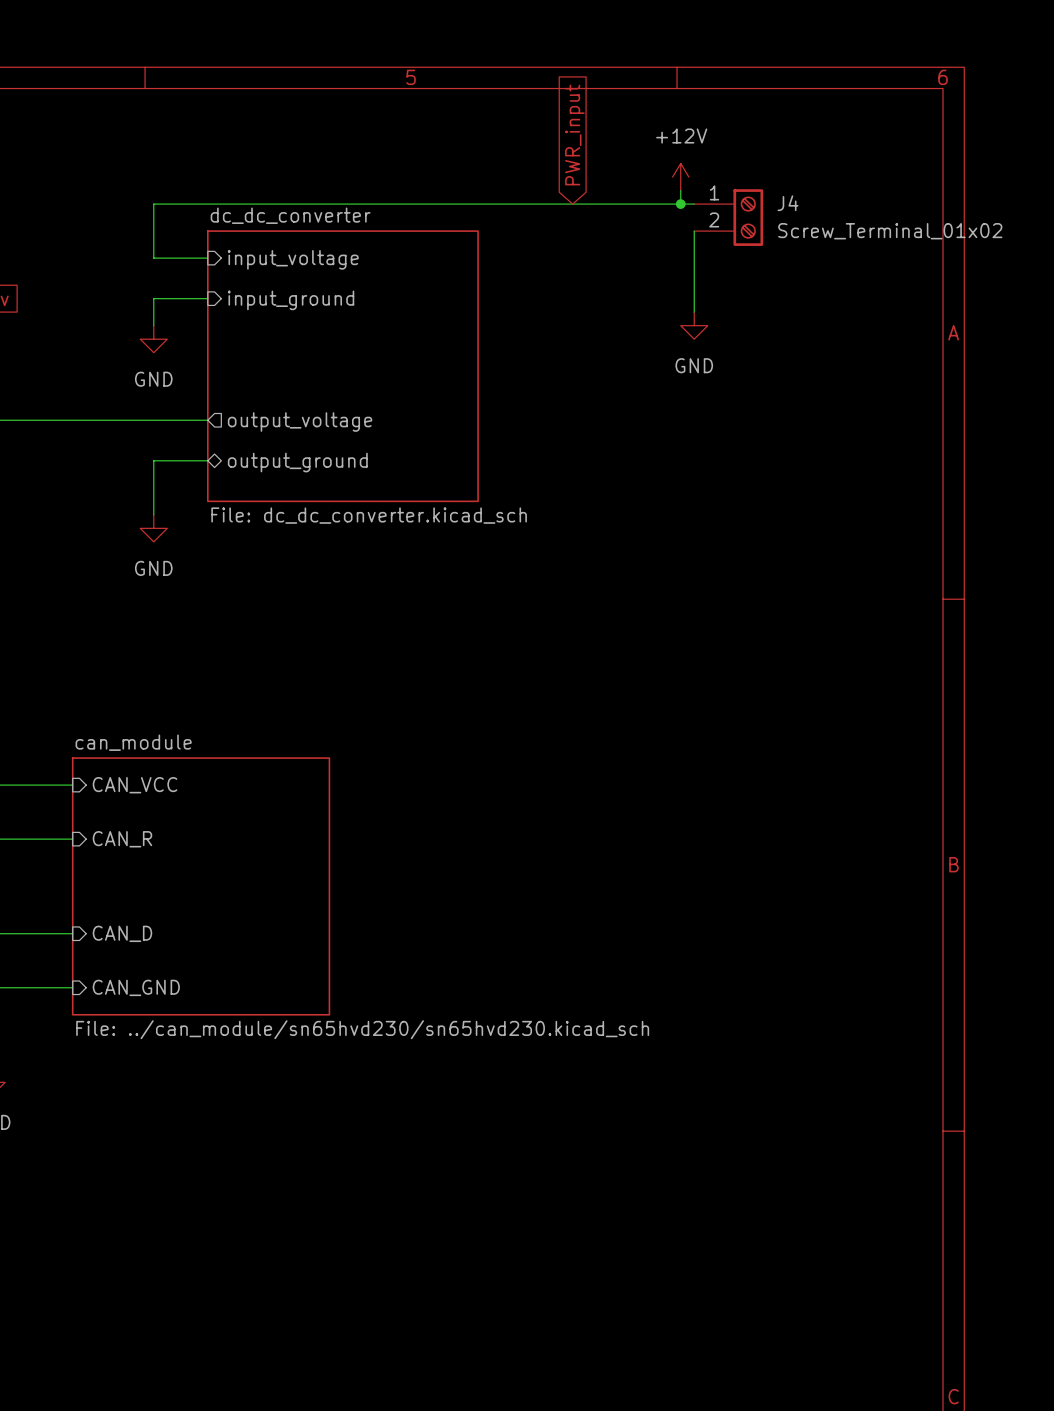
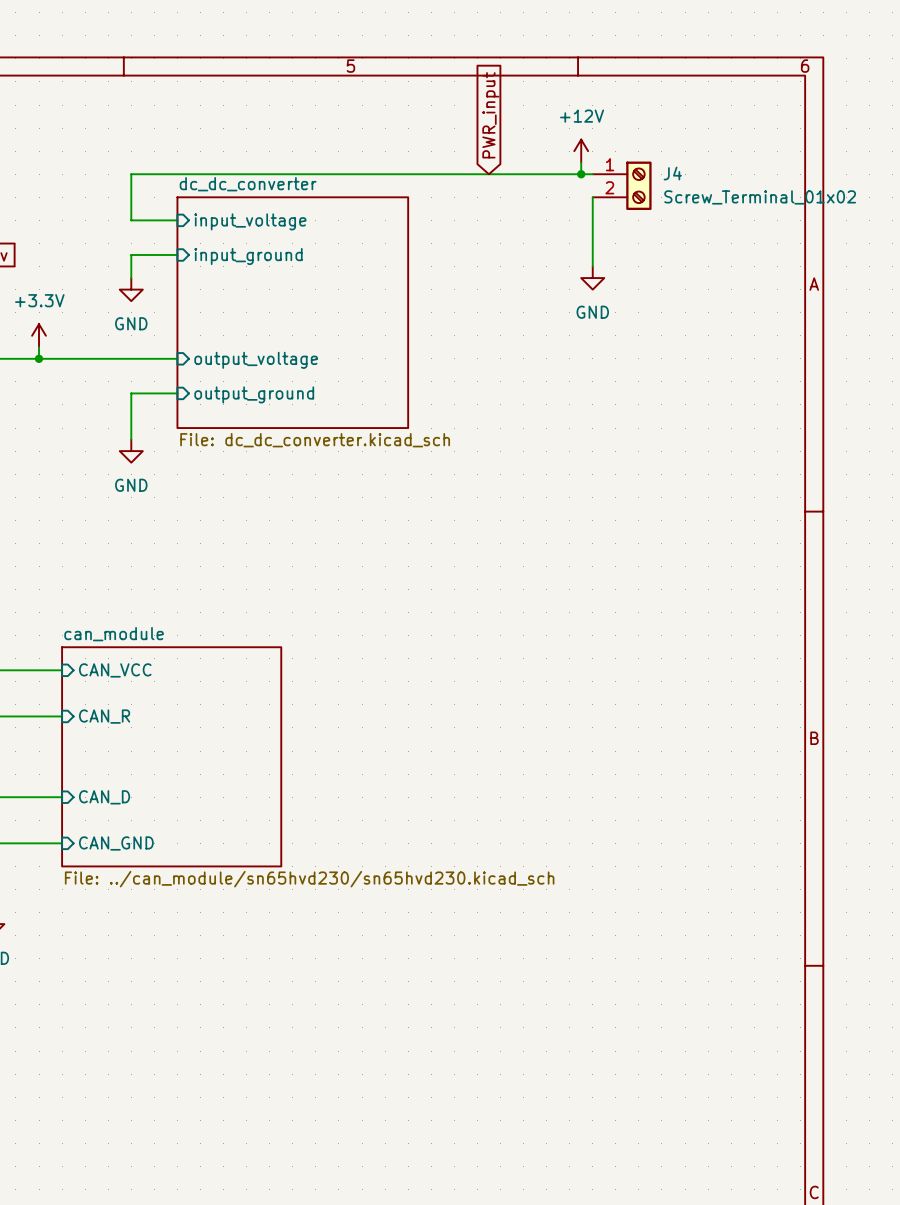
power symbol: none -> +3.3V (39, 335)
wire: none -> (39, 347) (39, 358)
junction: none -> (39, 358)
sheet pin shape: output (300, 422) -> input (256, 360)
sheet pin shape: bidirectional (297, 462) -> input (254, 394)

